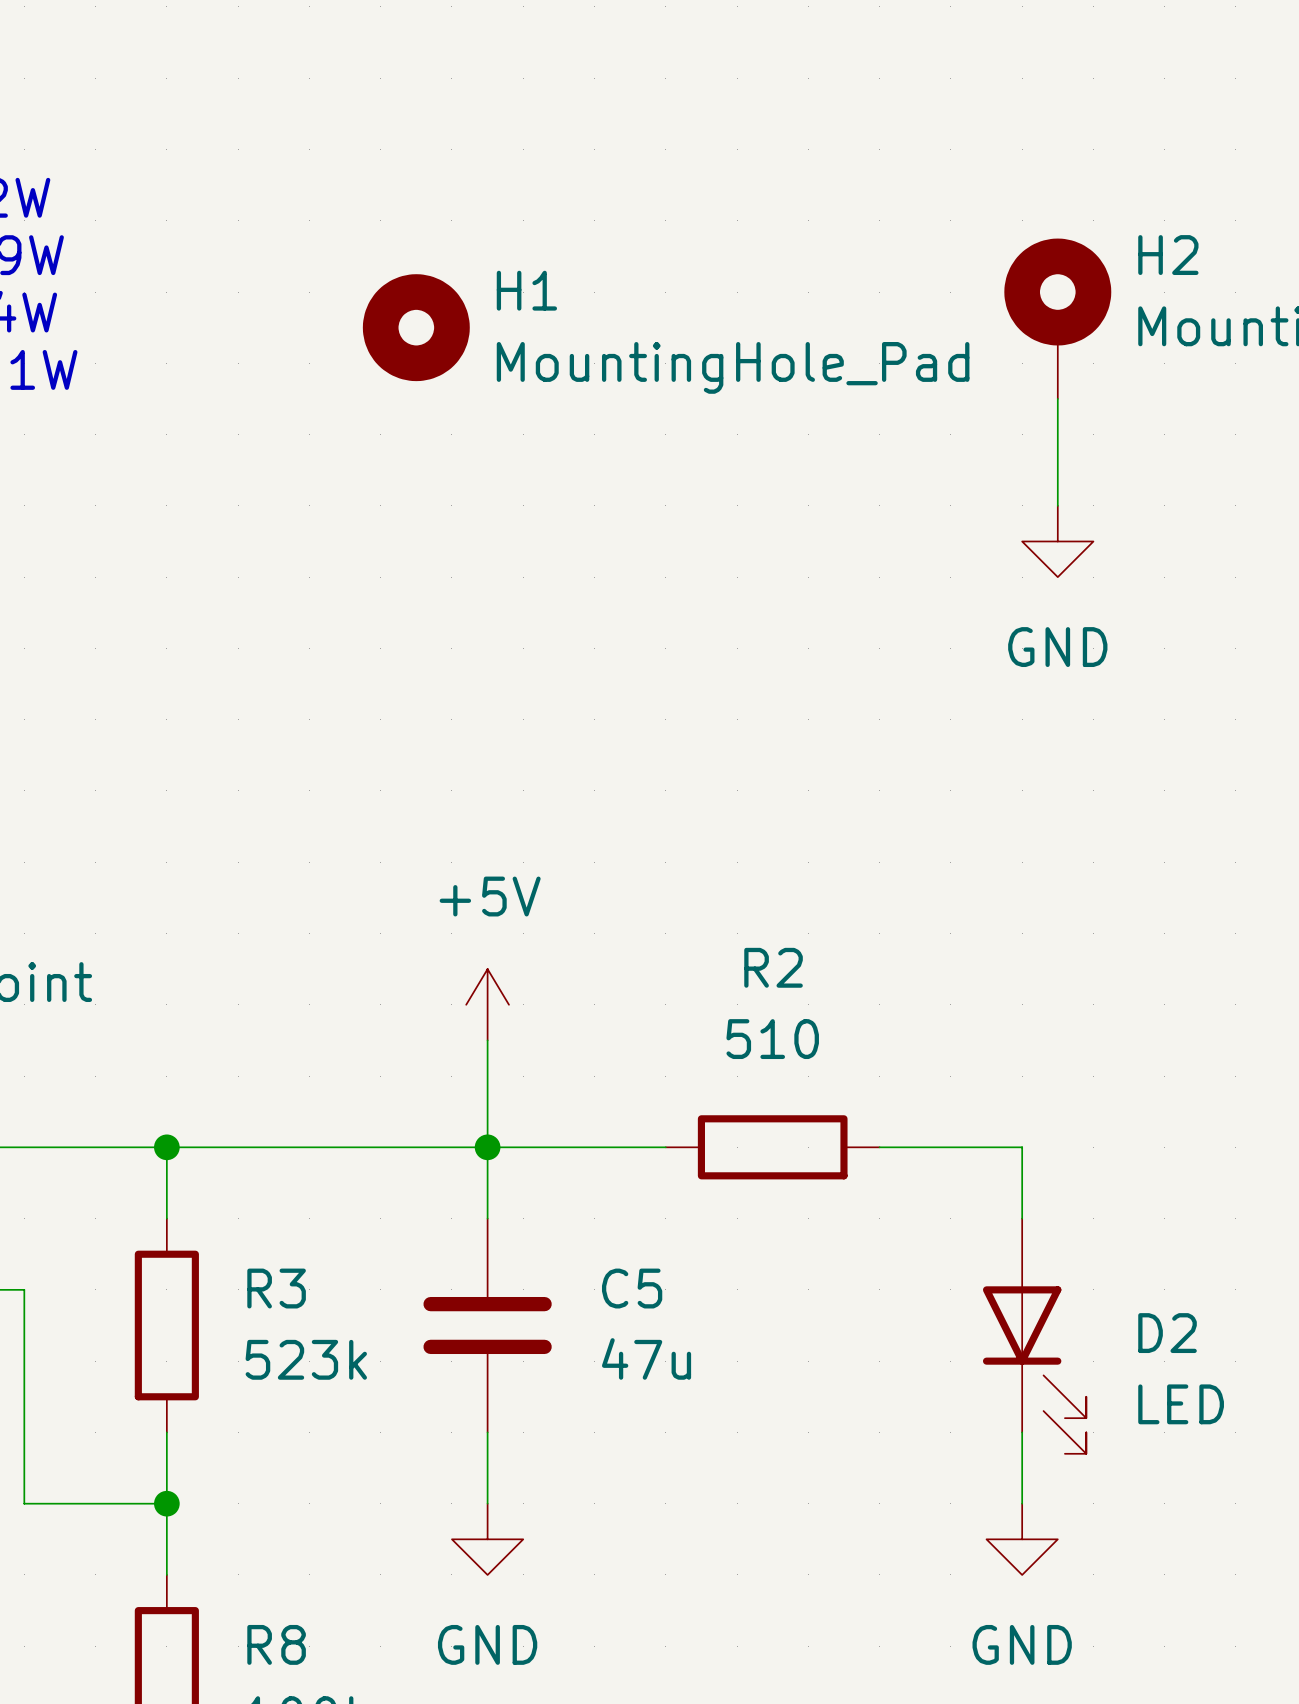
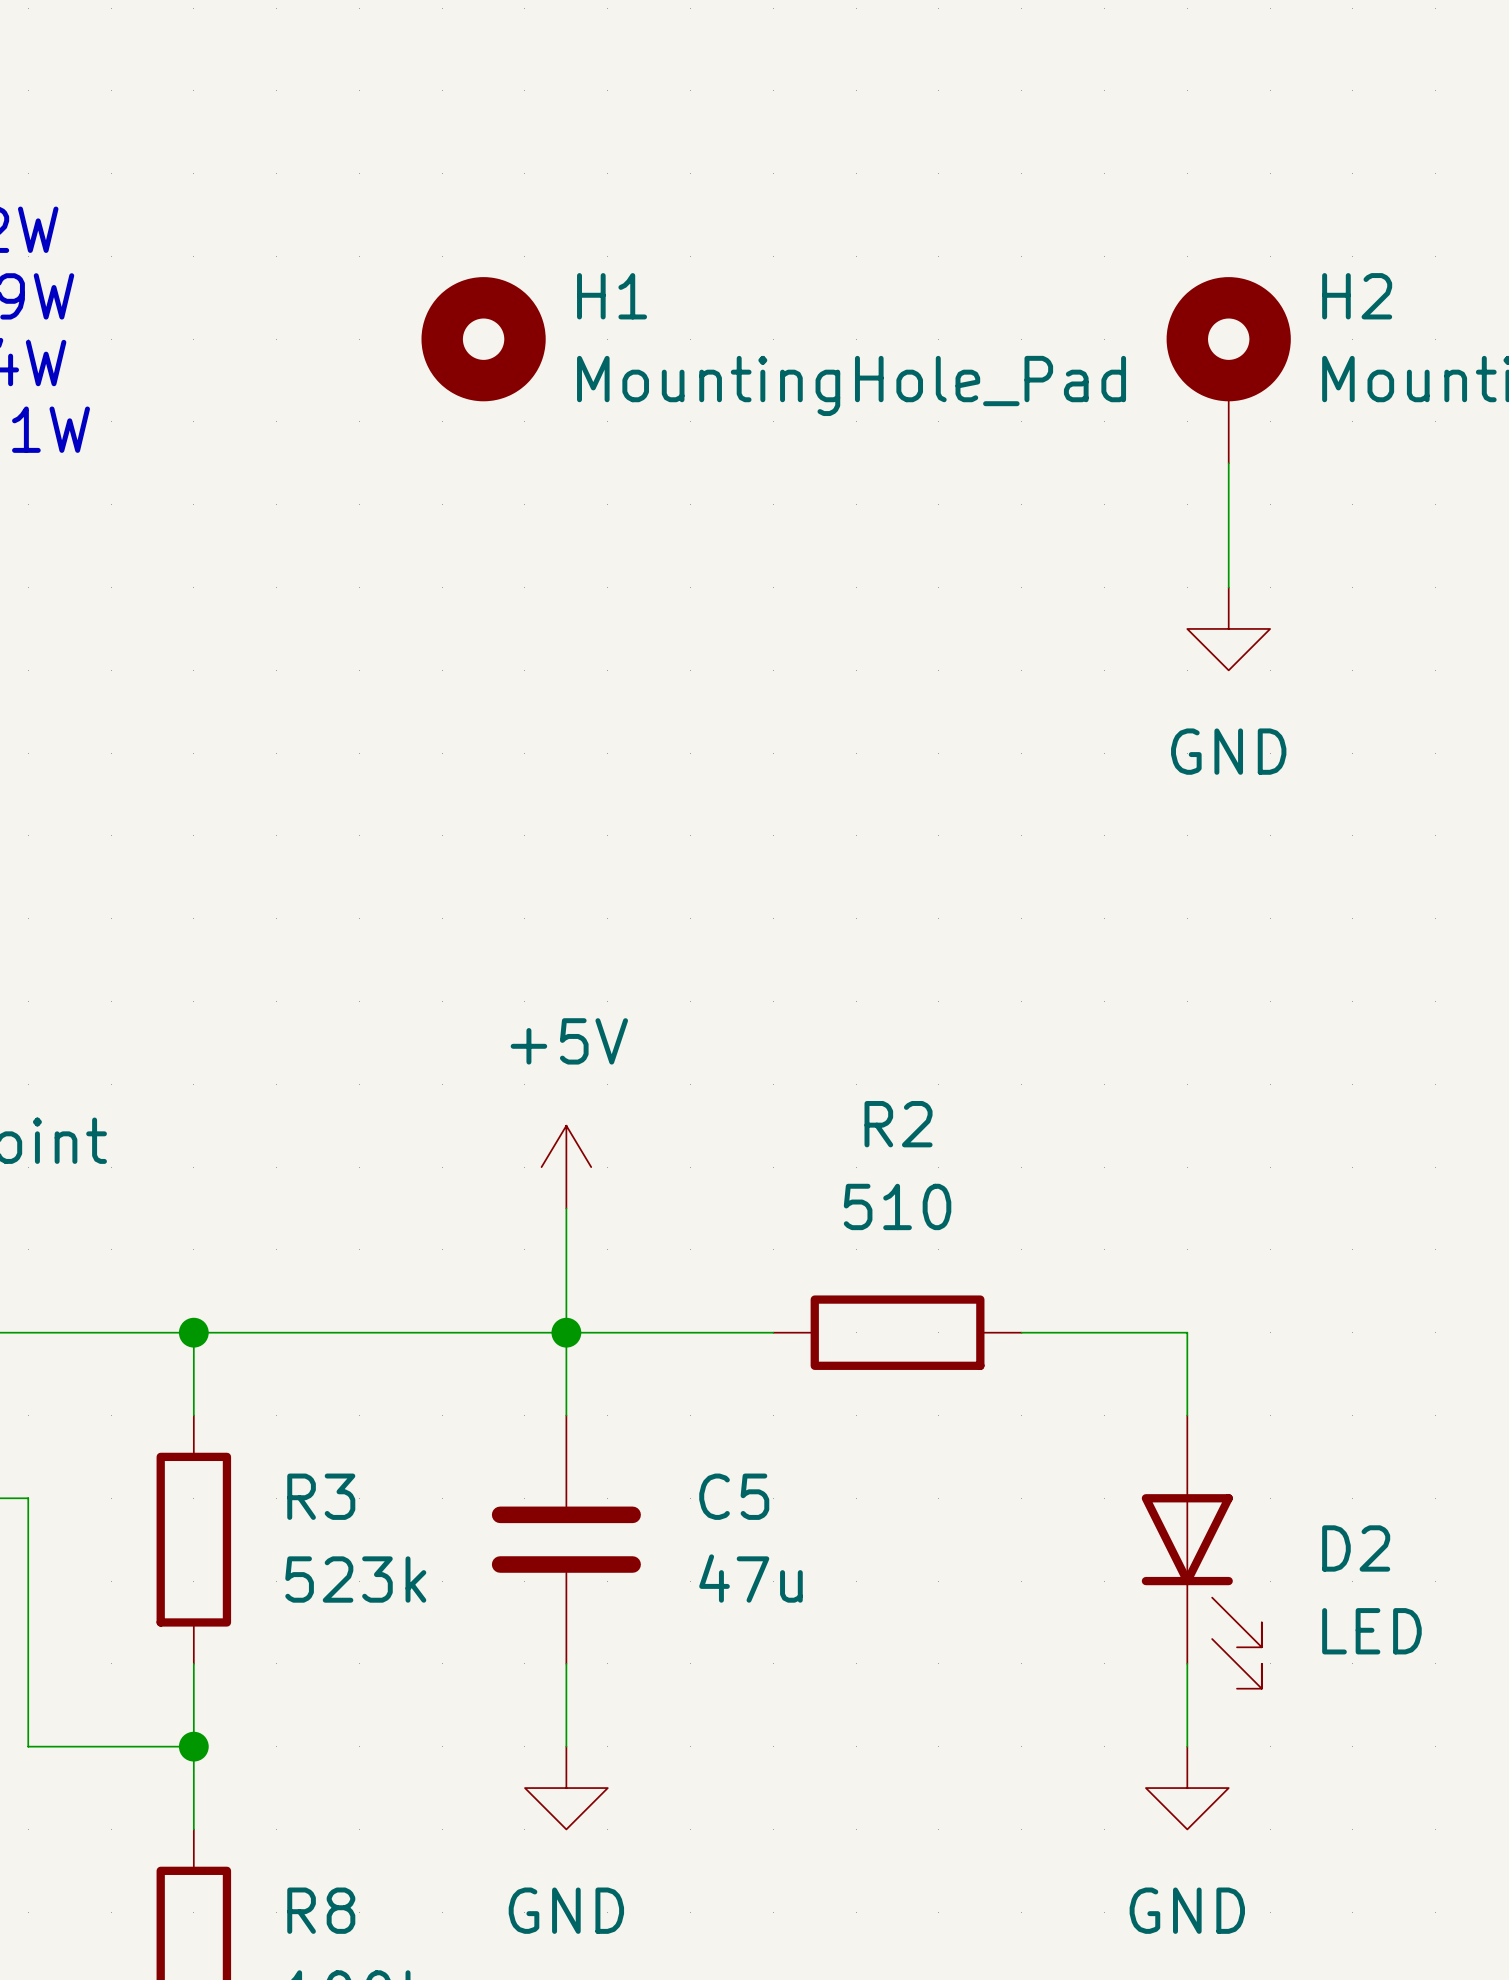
H1 position: (416, 327) -> (483, 339)

